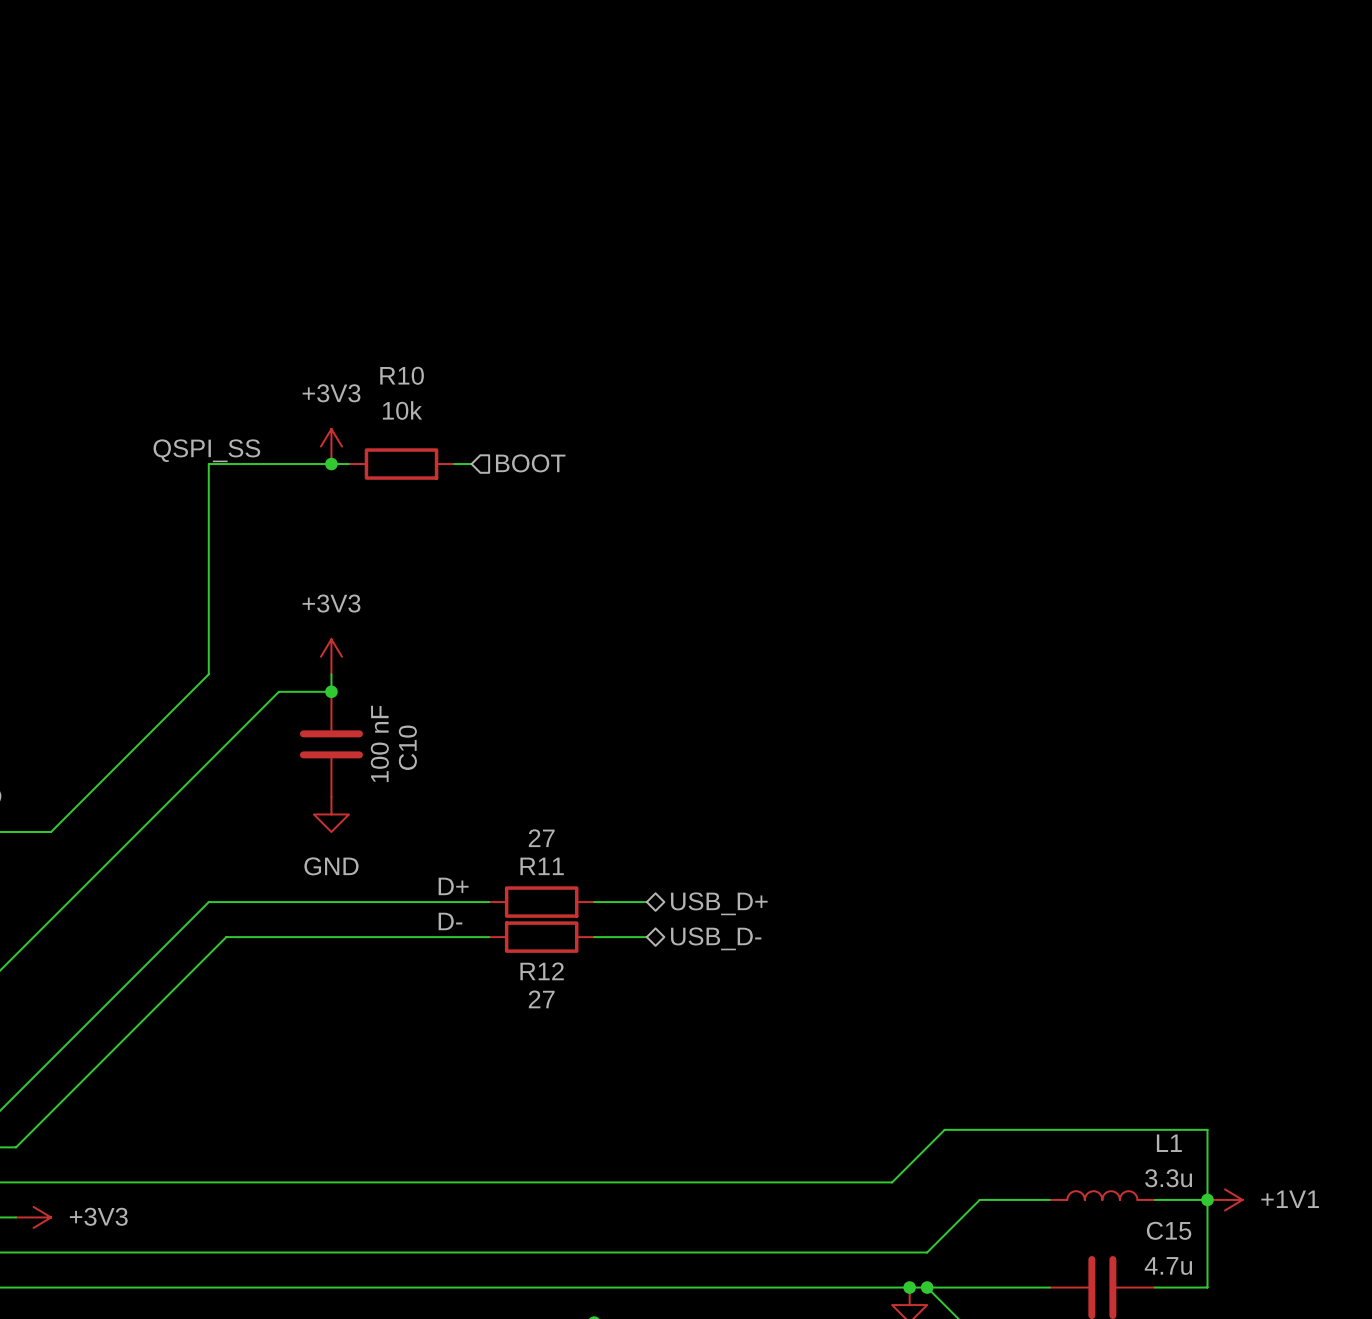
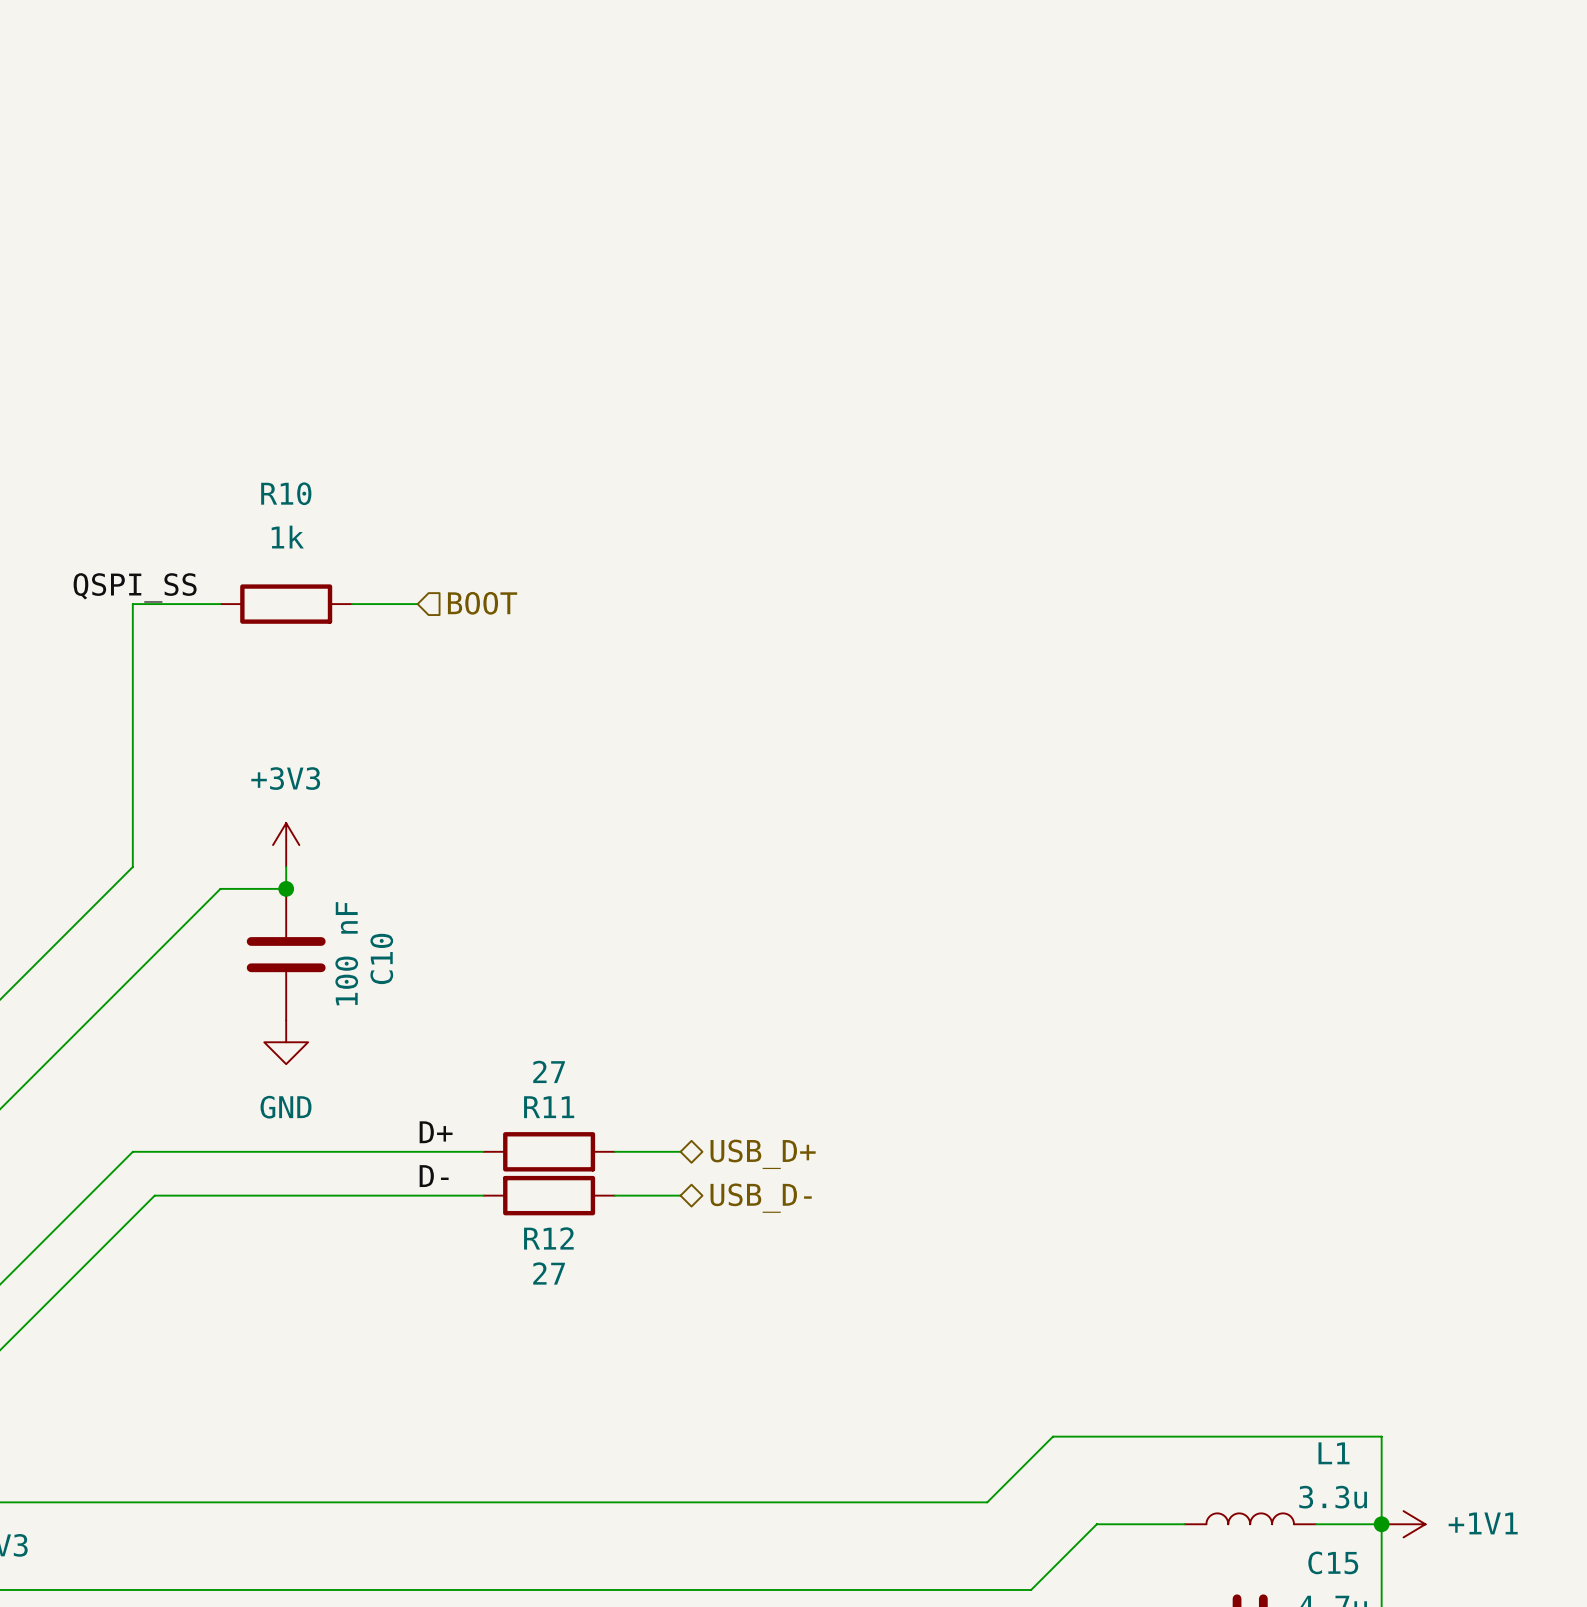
R10 value: 10k (402, 410) -> 1k (287, 537)
power symbol: +3V3 (331, 446) -> none
hierarchical label position: BOOT (530, 463) -> BOOT (482, 603)
wire: (278, 464) (348, 464) -> none
junction: (331, 464) -> none
wire: none -> (351, 604) (417, 604)
R10 position: (401, 464) -> (286, 604)
wire: (454, 464) (471, 464) -> none

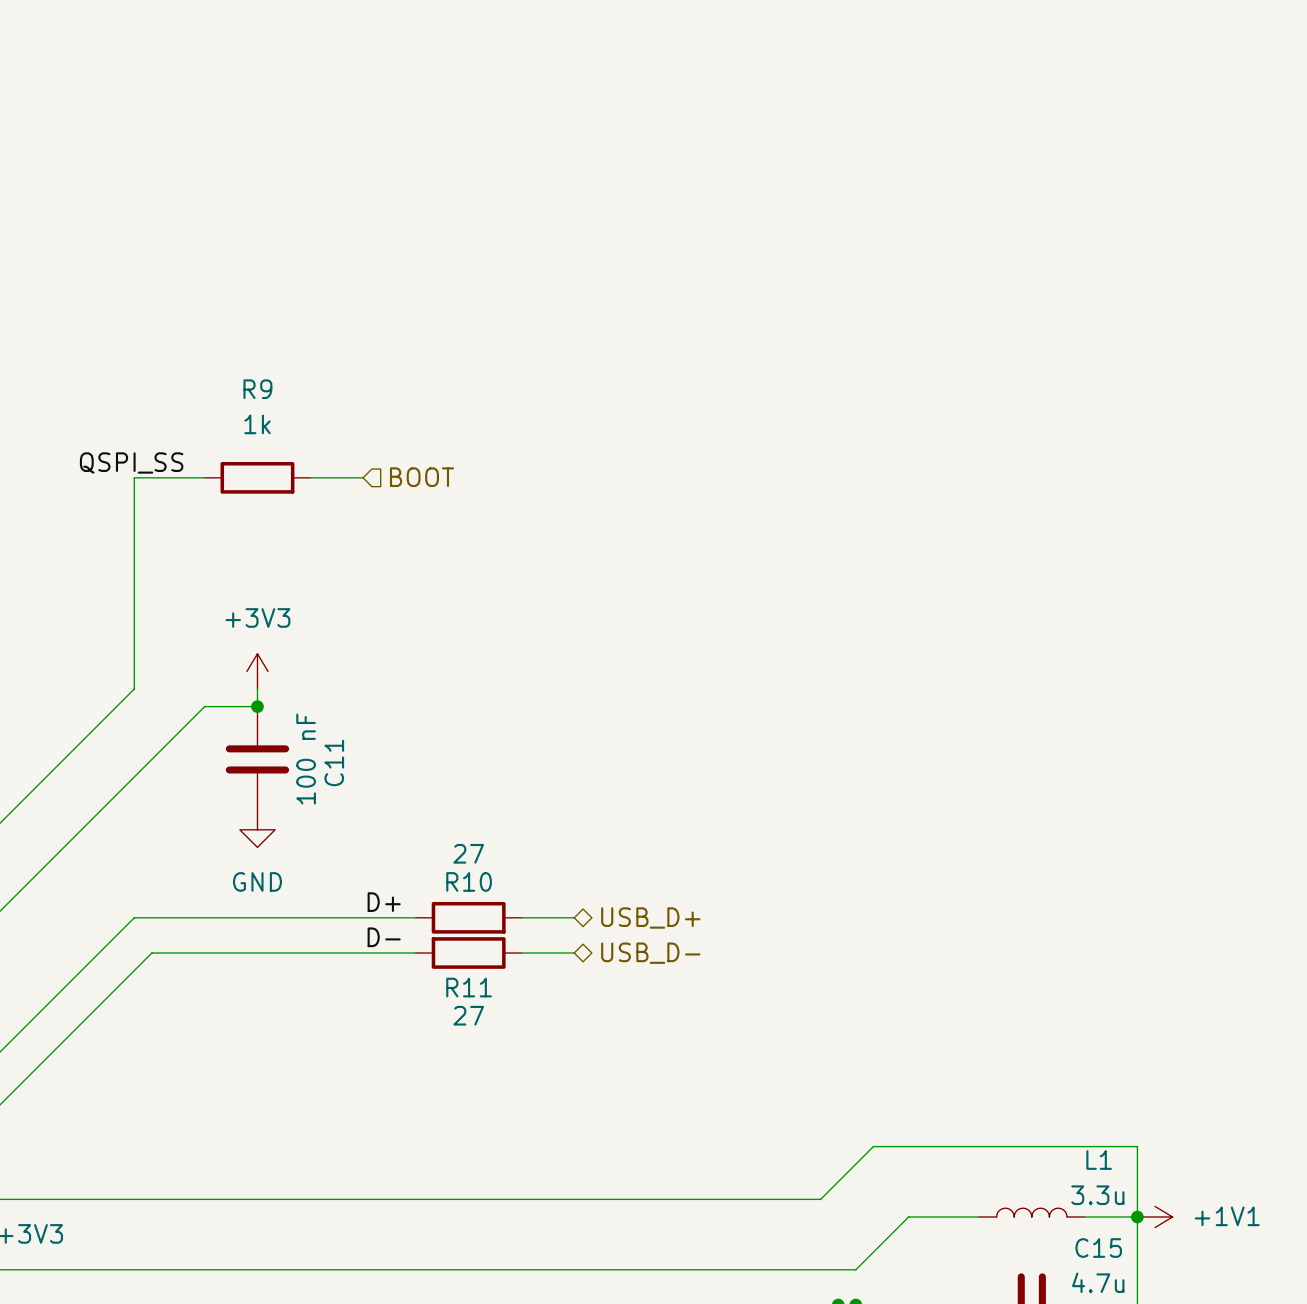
R10 name: R10 (286, 493) -> R9 (257, 389)
C10 name: C10 (381, 958) -> C11 (334, 762)
R11 name: R11 (549, 1107) -> R10 (469, 881)
R12 name: R12 (548, 1238) -> R11 (469, 987)

